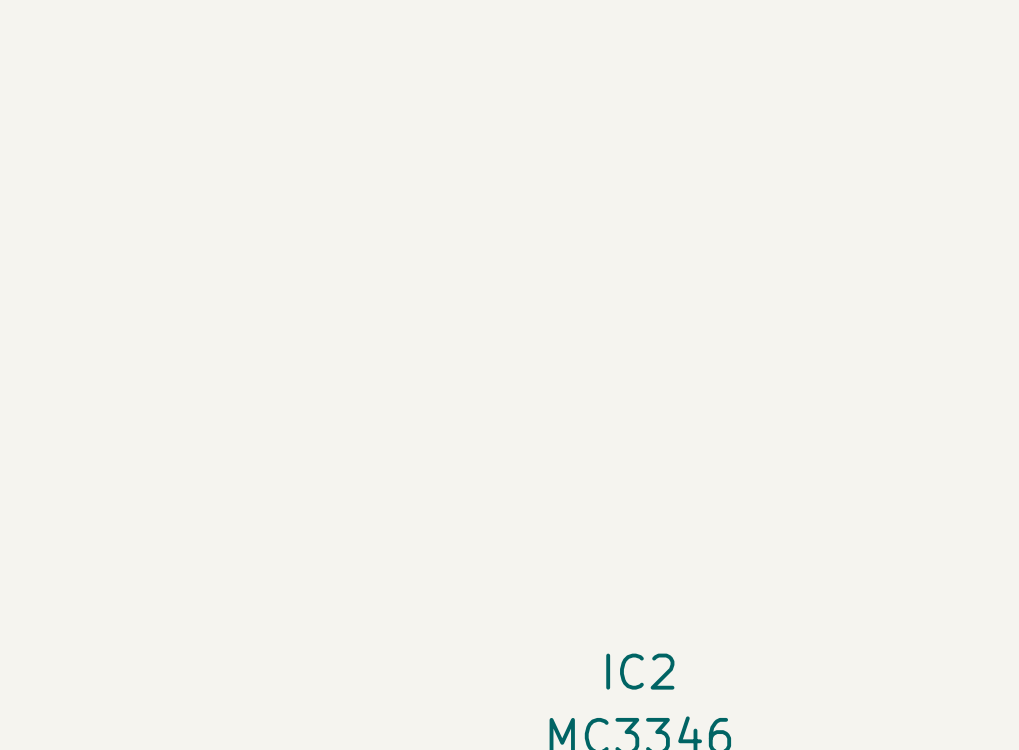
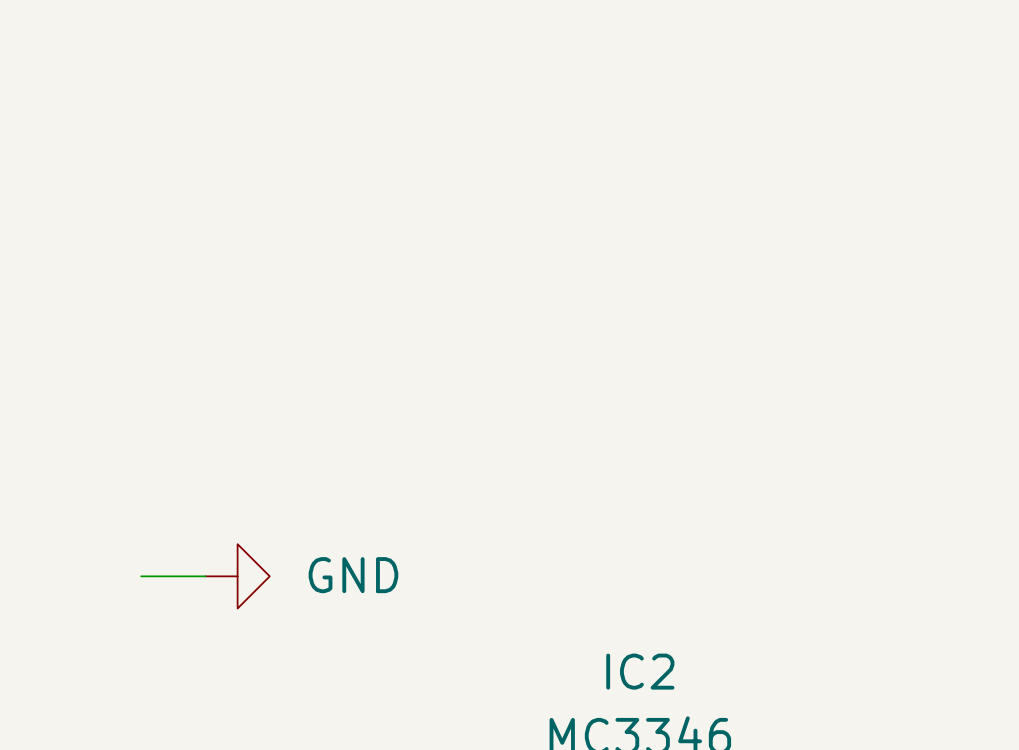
wire: none -> (141, 576) (205, 576)
power symbol: none -> GND (237, 576)

